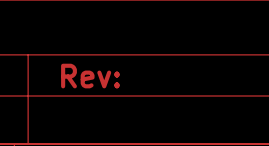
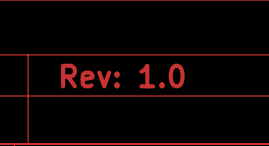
title block: Rev: (90, 76) -> Rev: 1.0 (122, 76)

